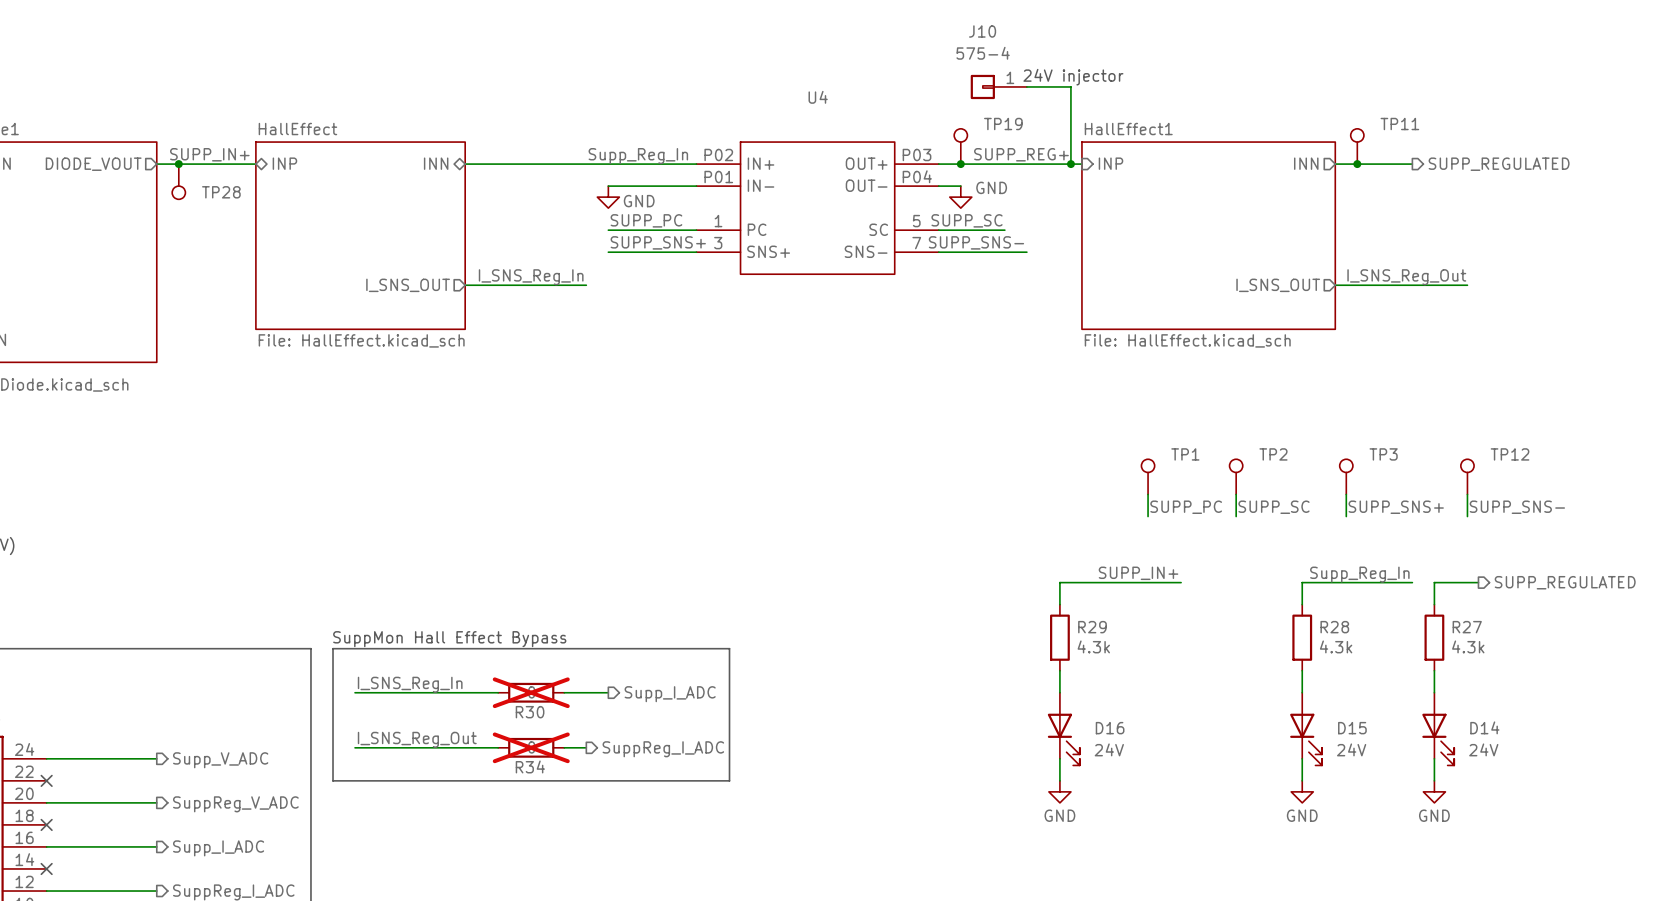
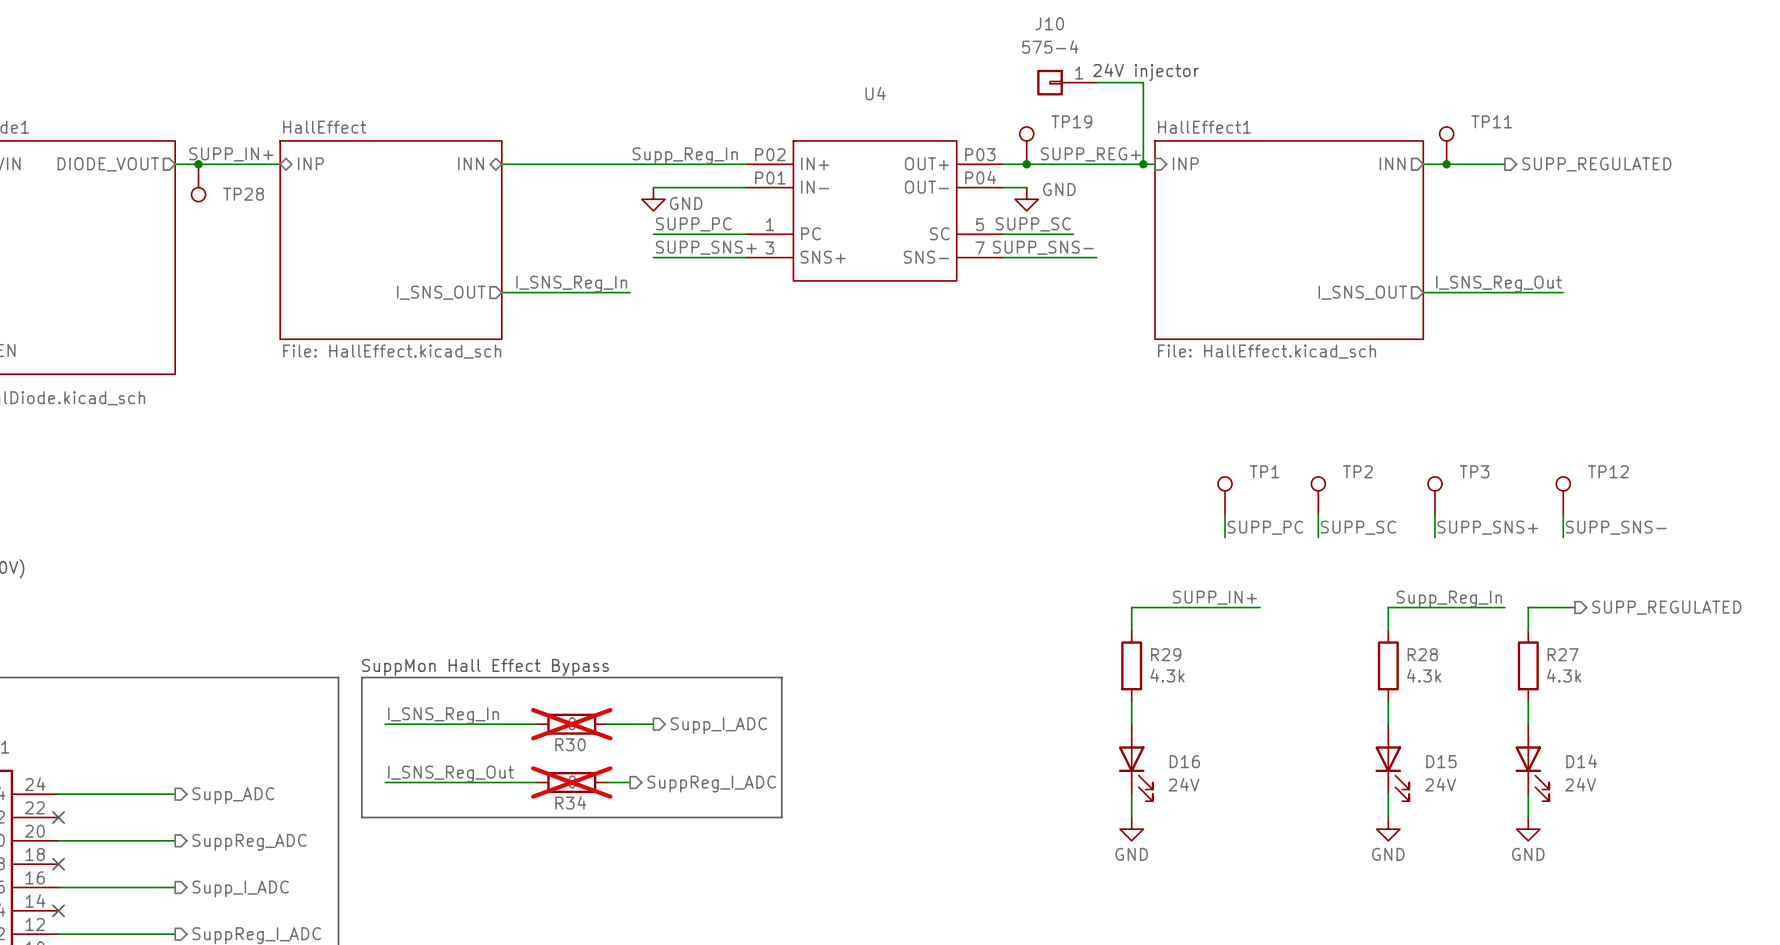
hierarchical label: Supp_V_ADC (220, 760) -> Supp_ADC (233, 795)
hierarchical label: SuppReg_V_ADC (235, 804) -> SuppReg_ADC (249, 842)

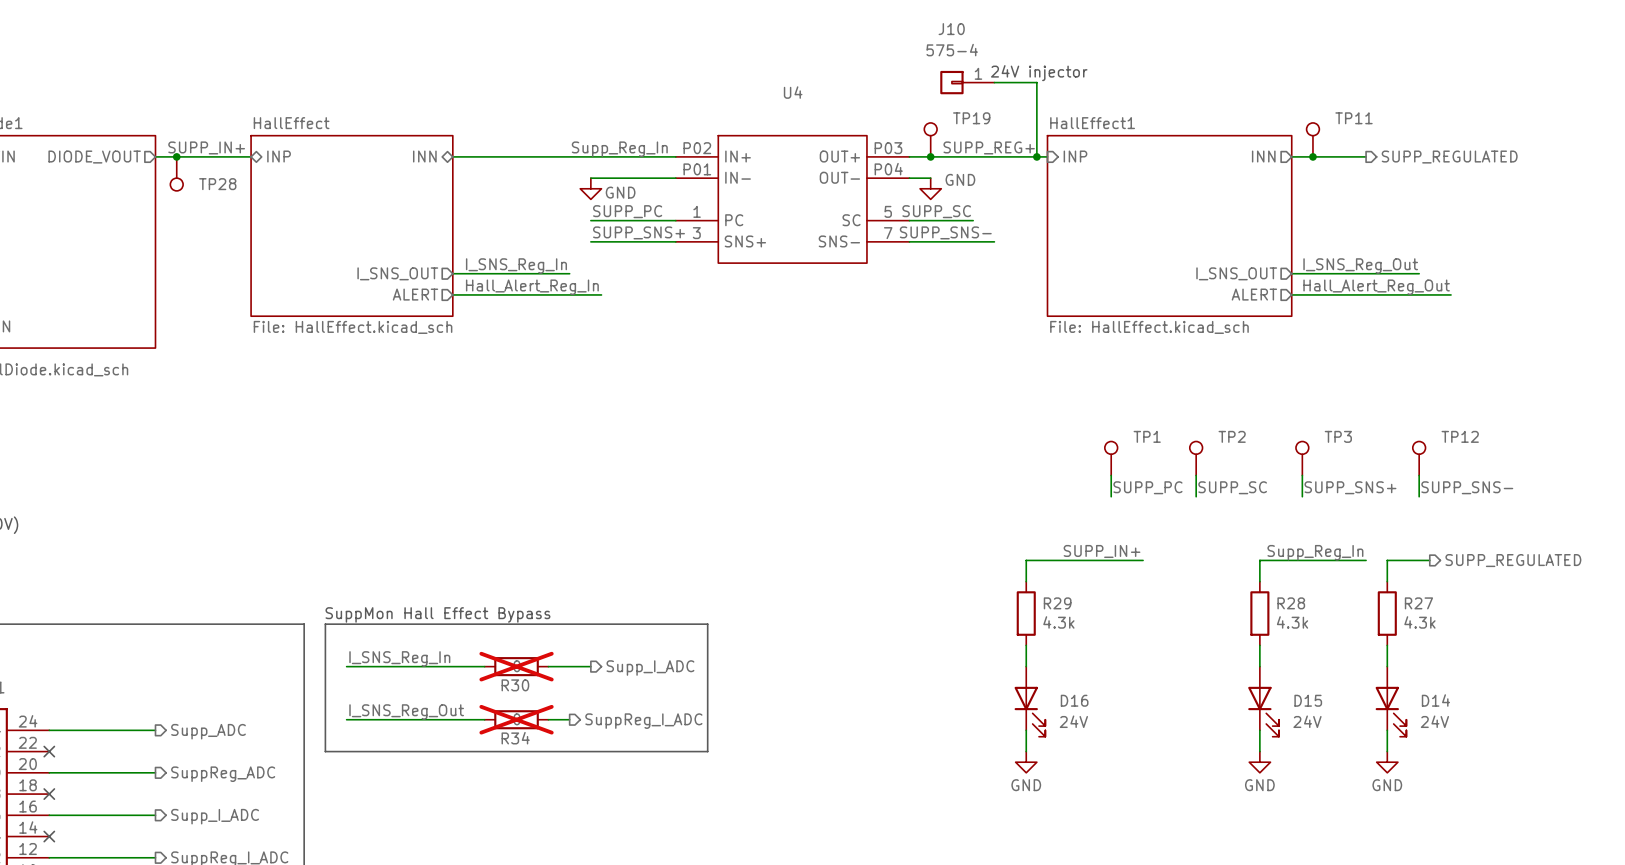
label: none -> Hall_Alert_Reg_In (532, 287)
label: none -> Hall_Alert_Reg_Out (1376, 287)
sheet pin: none -> ALERT (415, 294)
wire: none -> (452, 294) (601, 294)
sheet pin: none -> ALERT (1254, 294)
wire: none -> (1291, 294) (1451, 294)

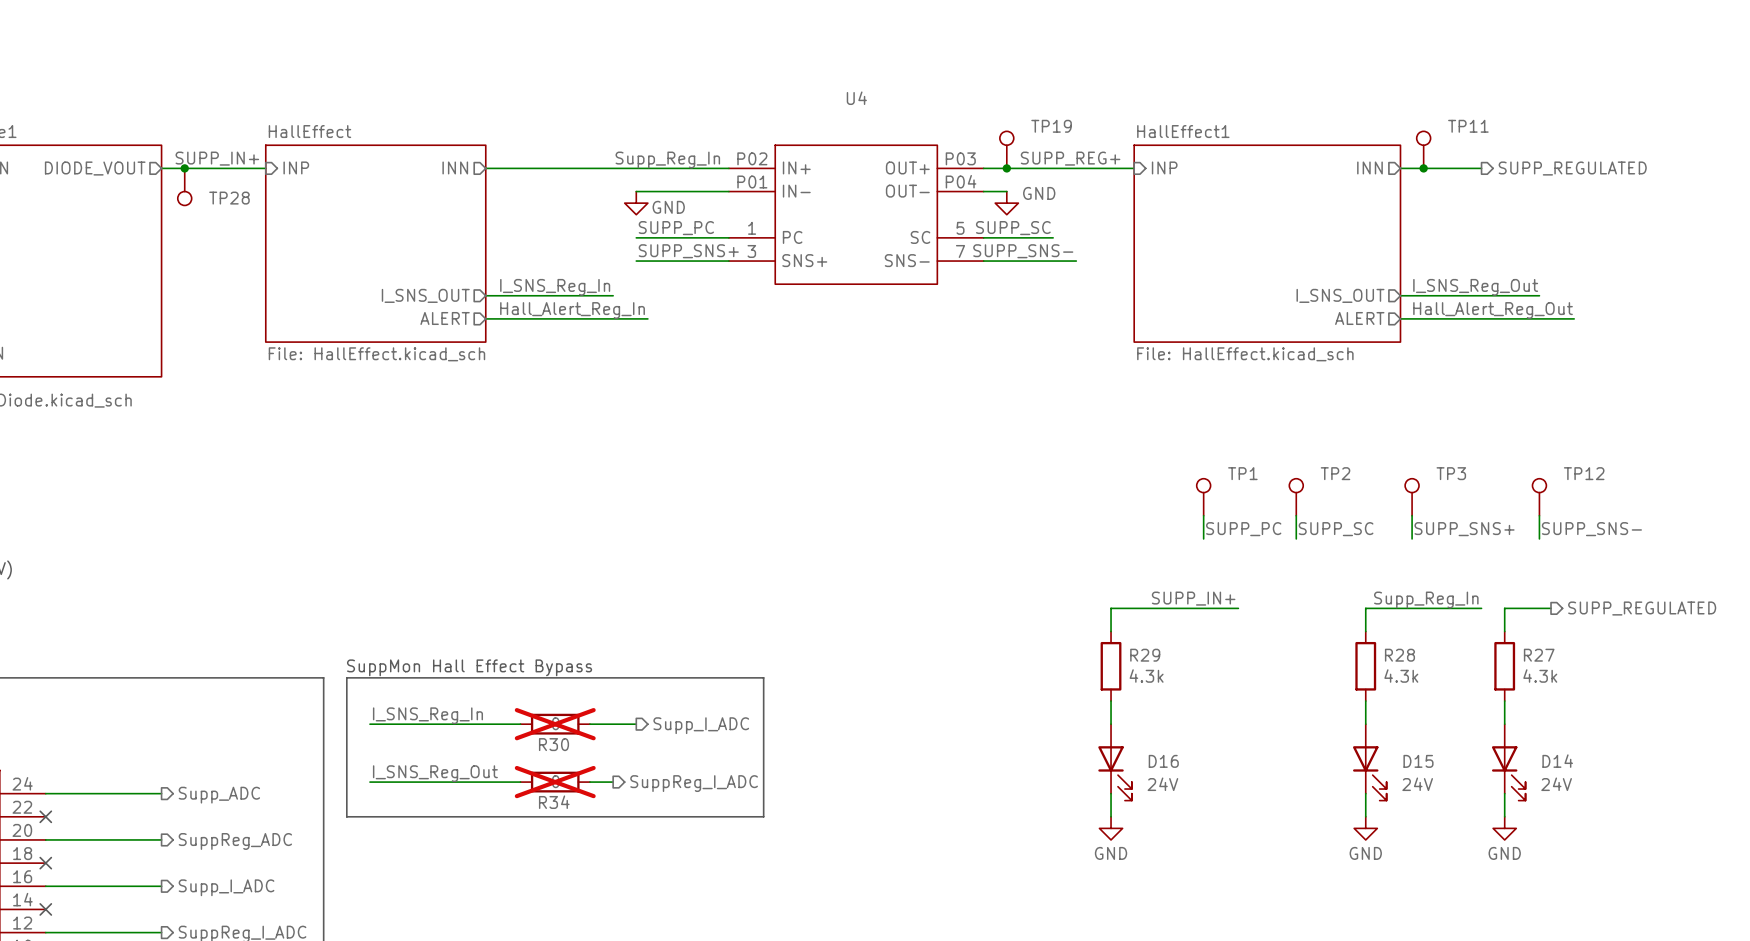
text: 24V injector (1039, 73) -> none
J10: 575-4 (967, 82) -> none
wire: (994, 82) (1036, 82) (1036, 156) -> none
sheet pin shape: bidirectional (279, 156) -> input (296, 167)
sheet pin shape: bidirectional (424, 156) -> output (455, 167)
junction: (1036, 156) -> none

